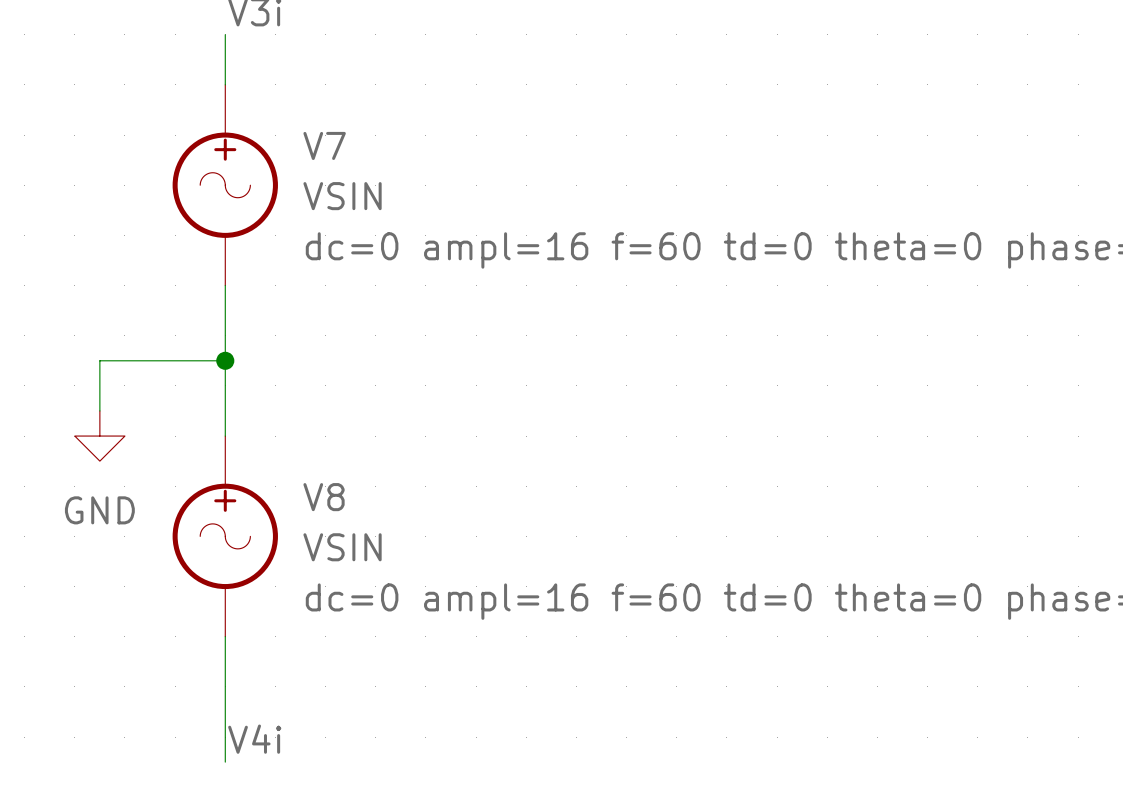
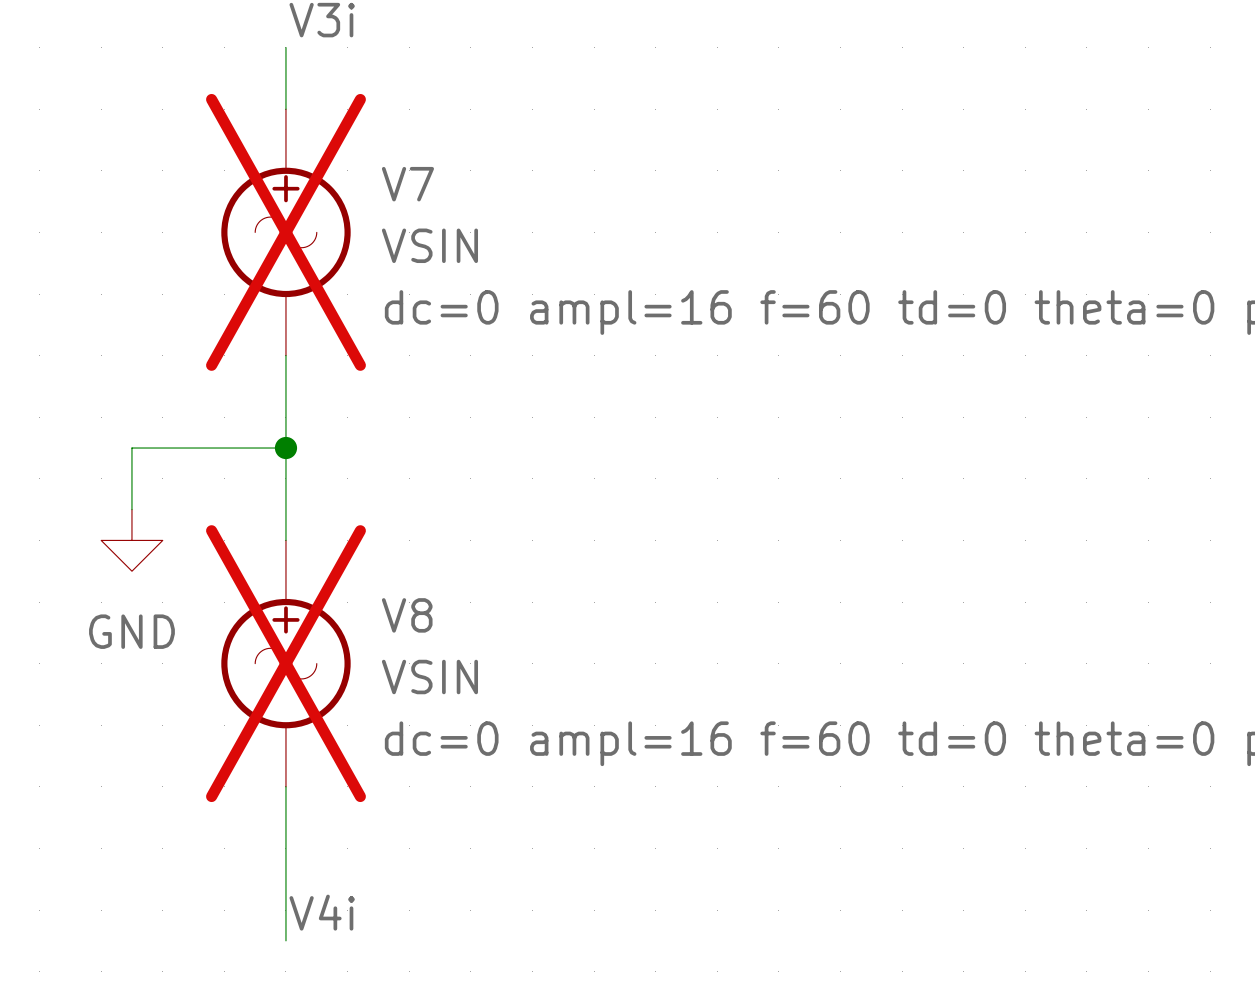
V7 do-not-place cross: none -> (285, 232)
V8 do-not-place cross: none -> (285, 663)

